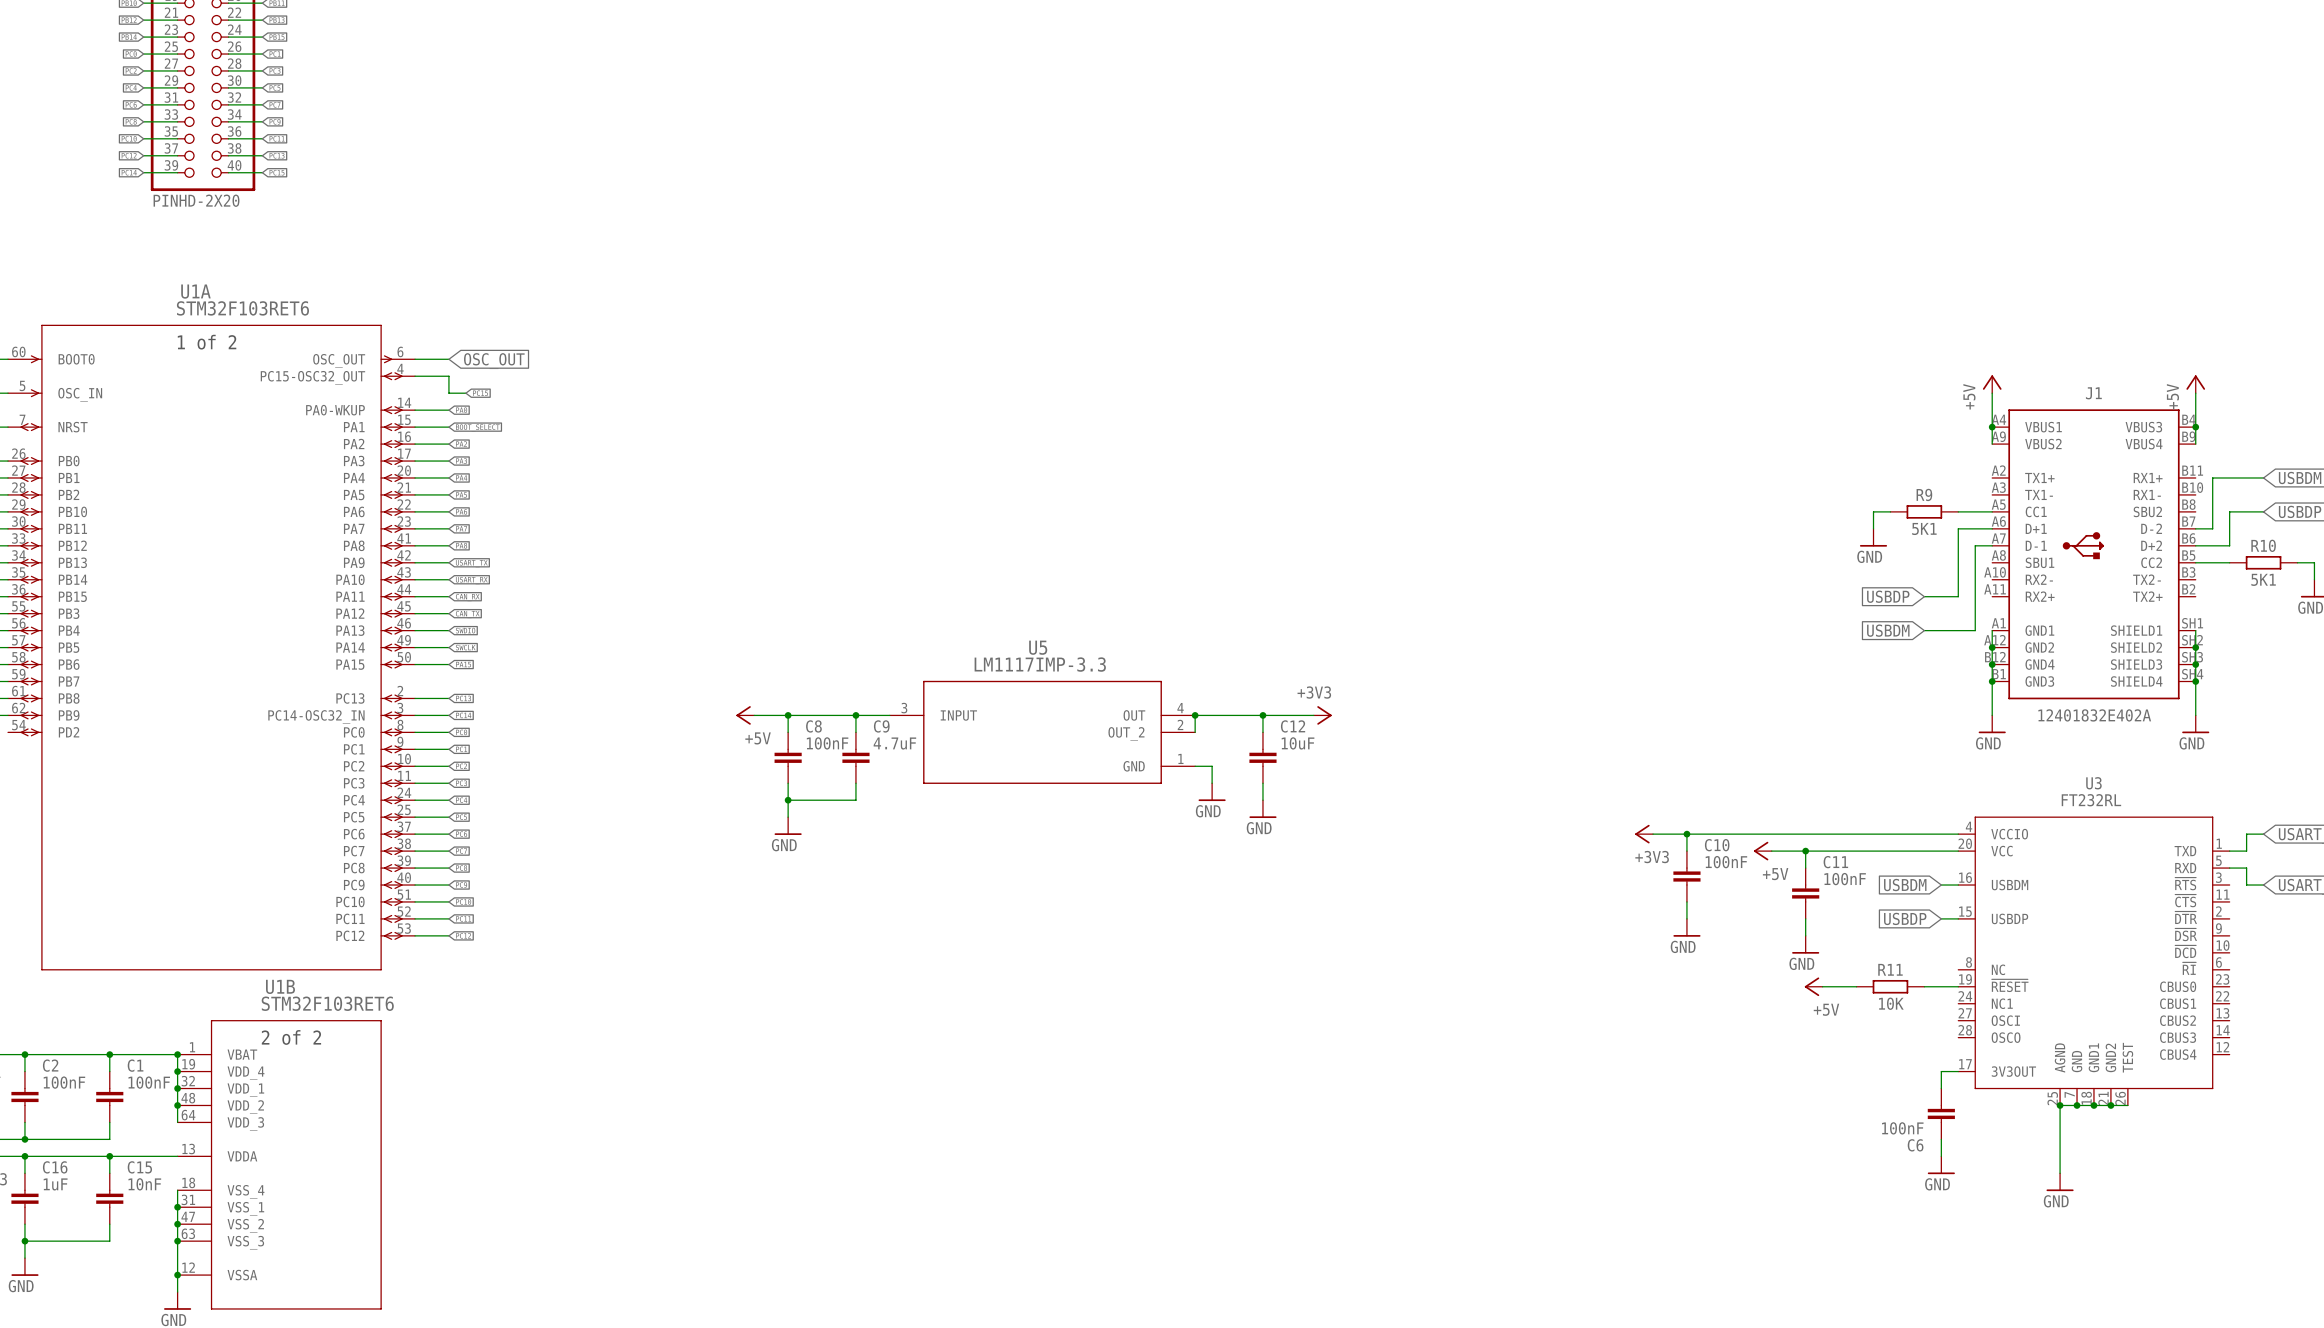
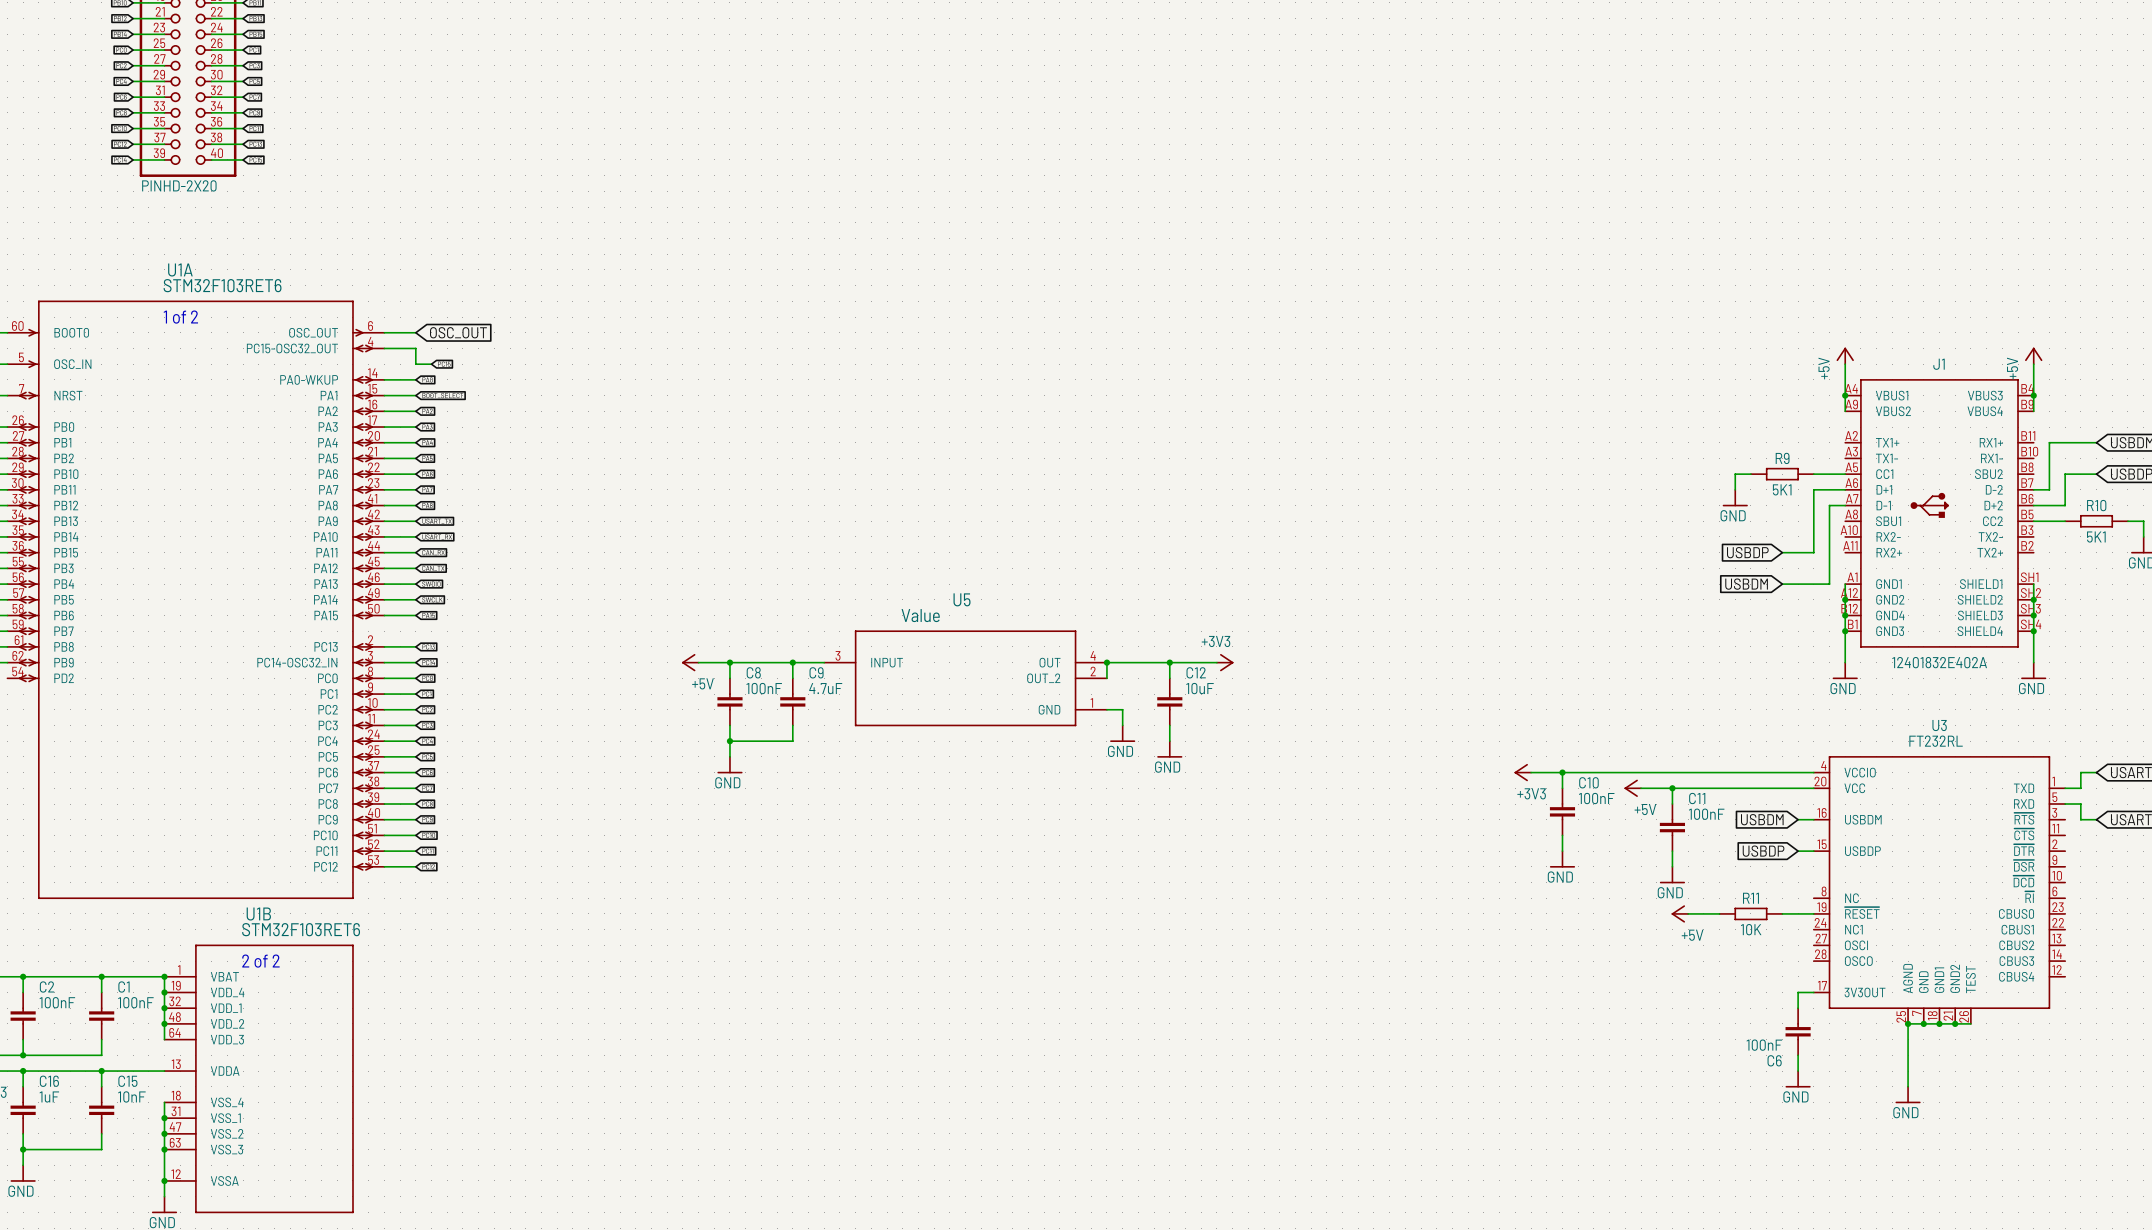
U5 value: LM1117IMP-3.3 (1040, 664) -> Value (920, 615)

